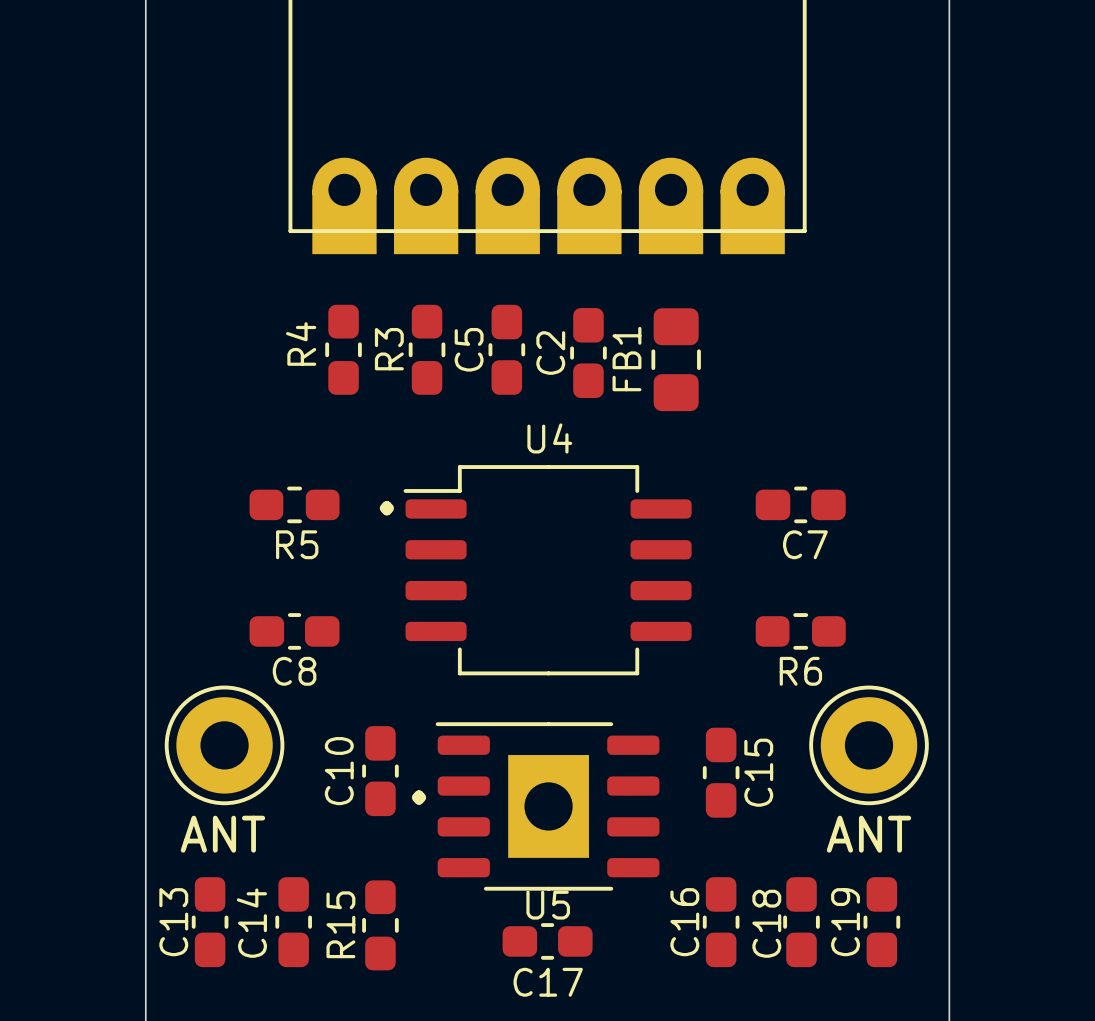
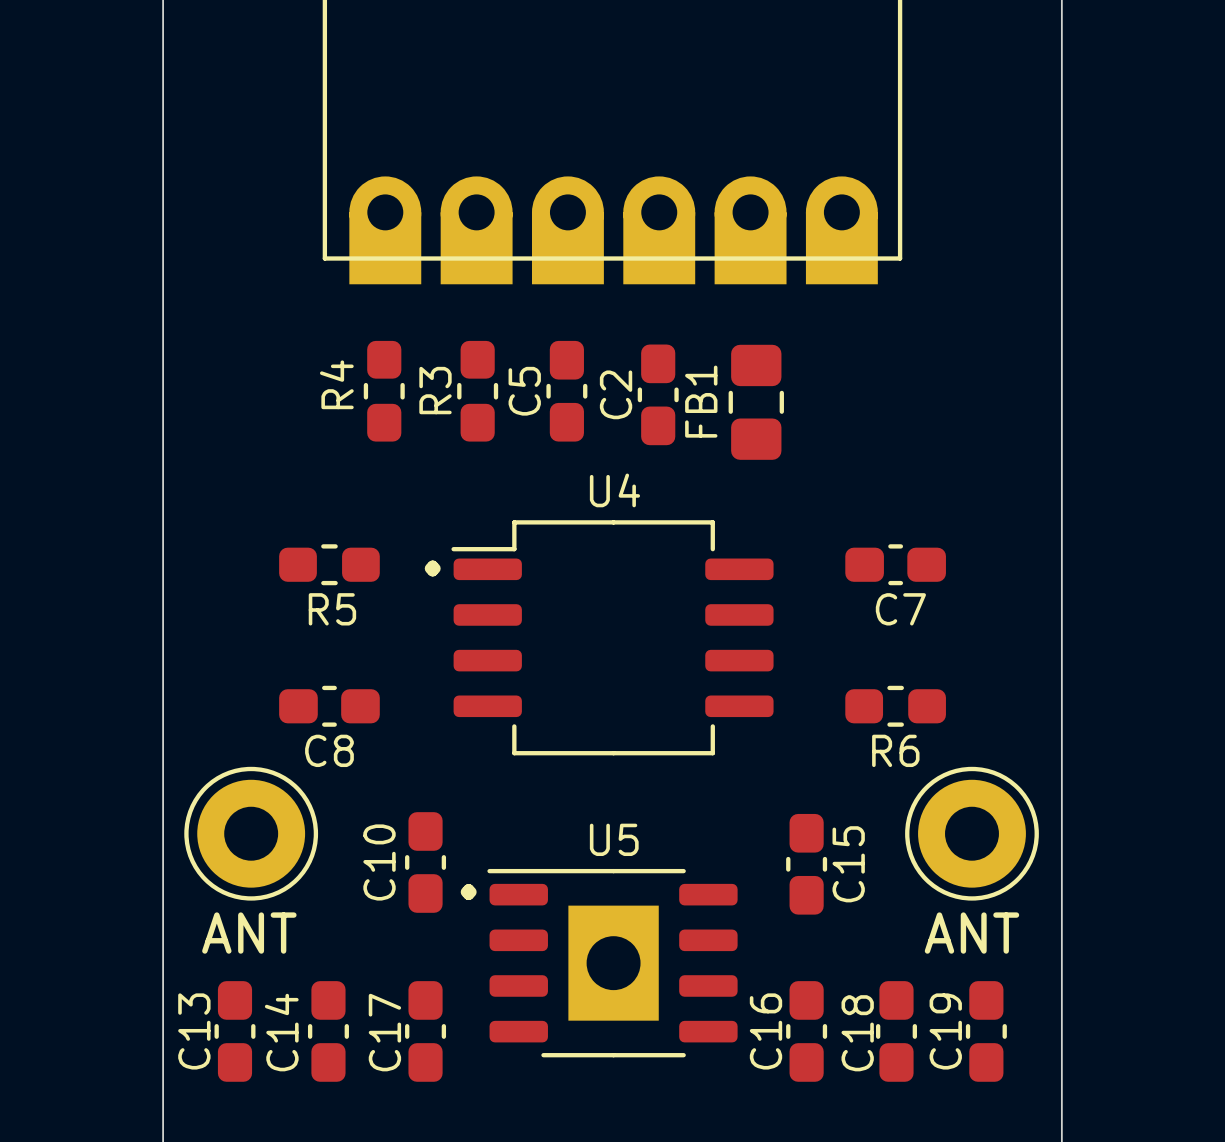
U5 position: (547, 806) -> (612, 963)
U5 name position: U5 (548, 905) -> U5 (614, 839)
R15: (380, 925) -> none
C17 rotation: 0° (547, 941) -> 90° clockwise (425, 1031)
C17 position: (547, 941) -> (425, 1031)

